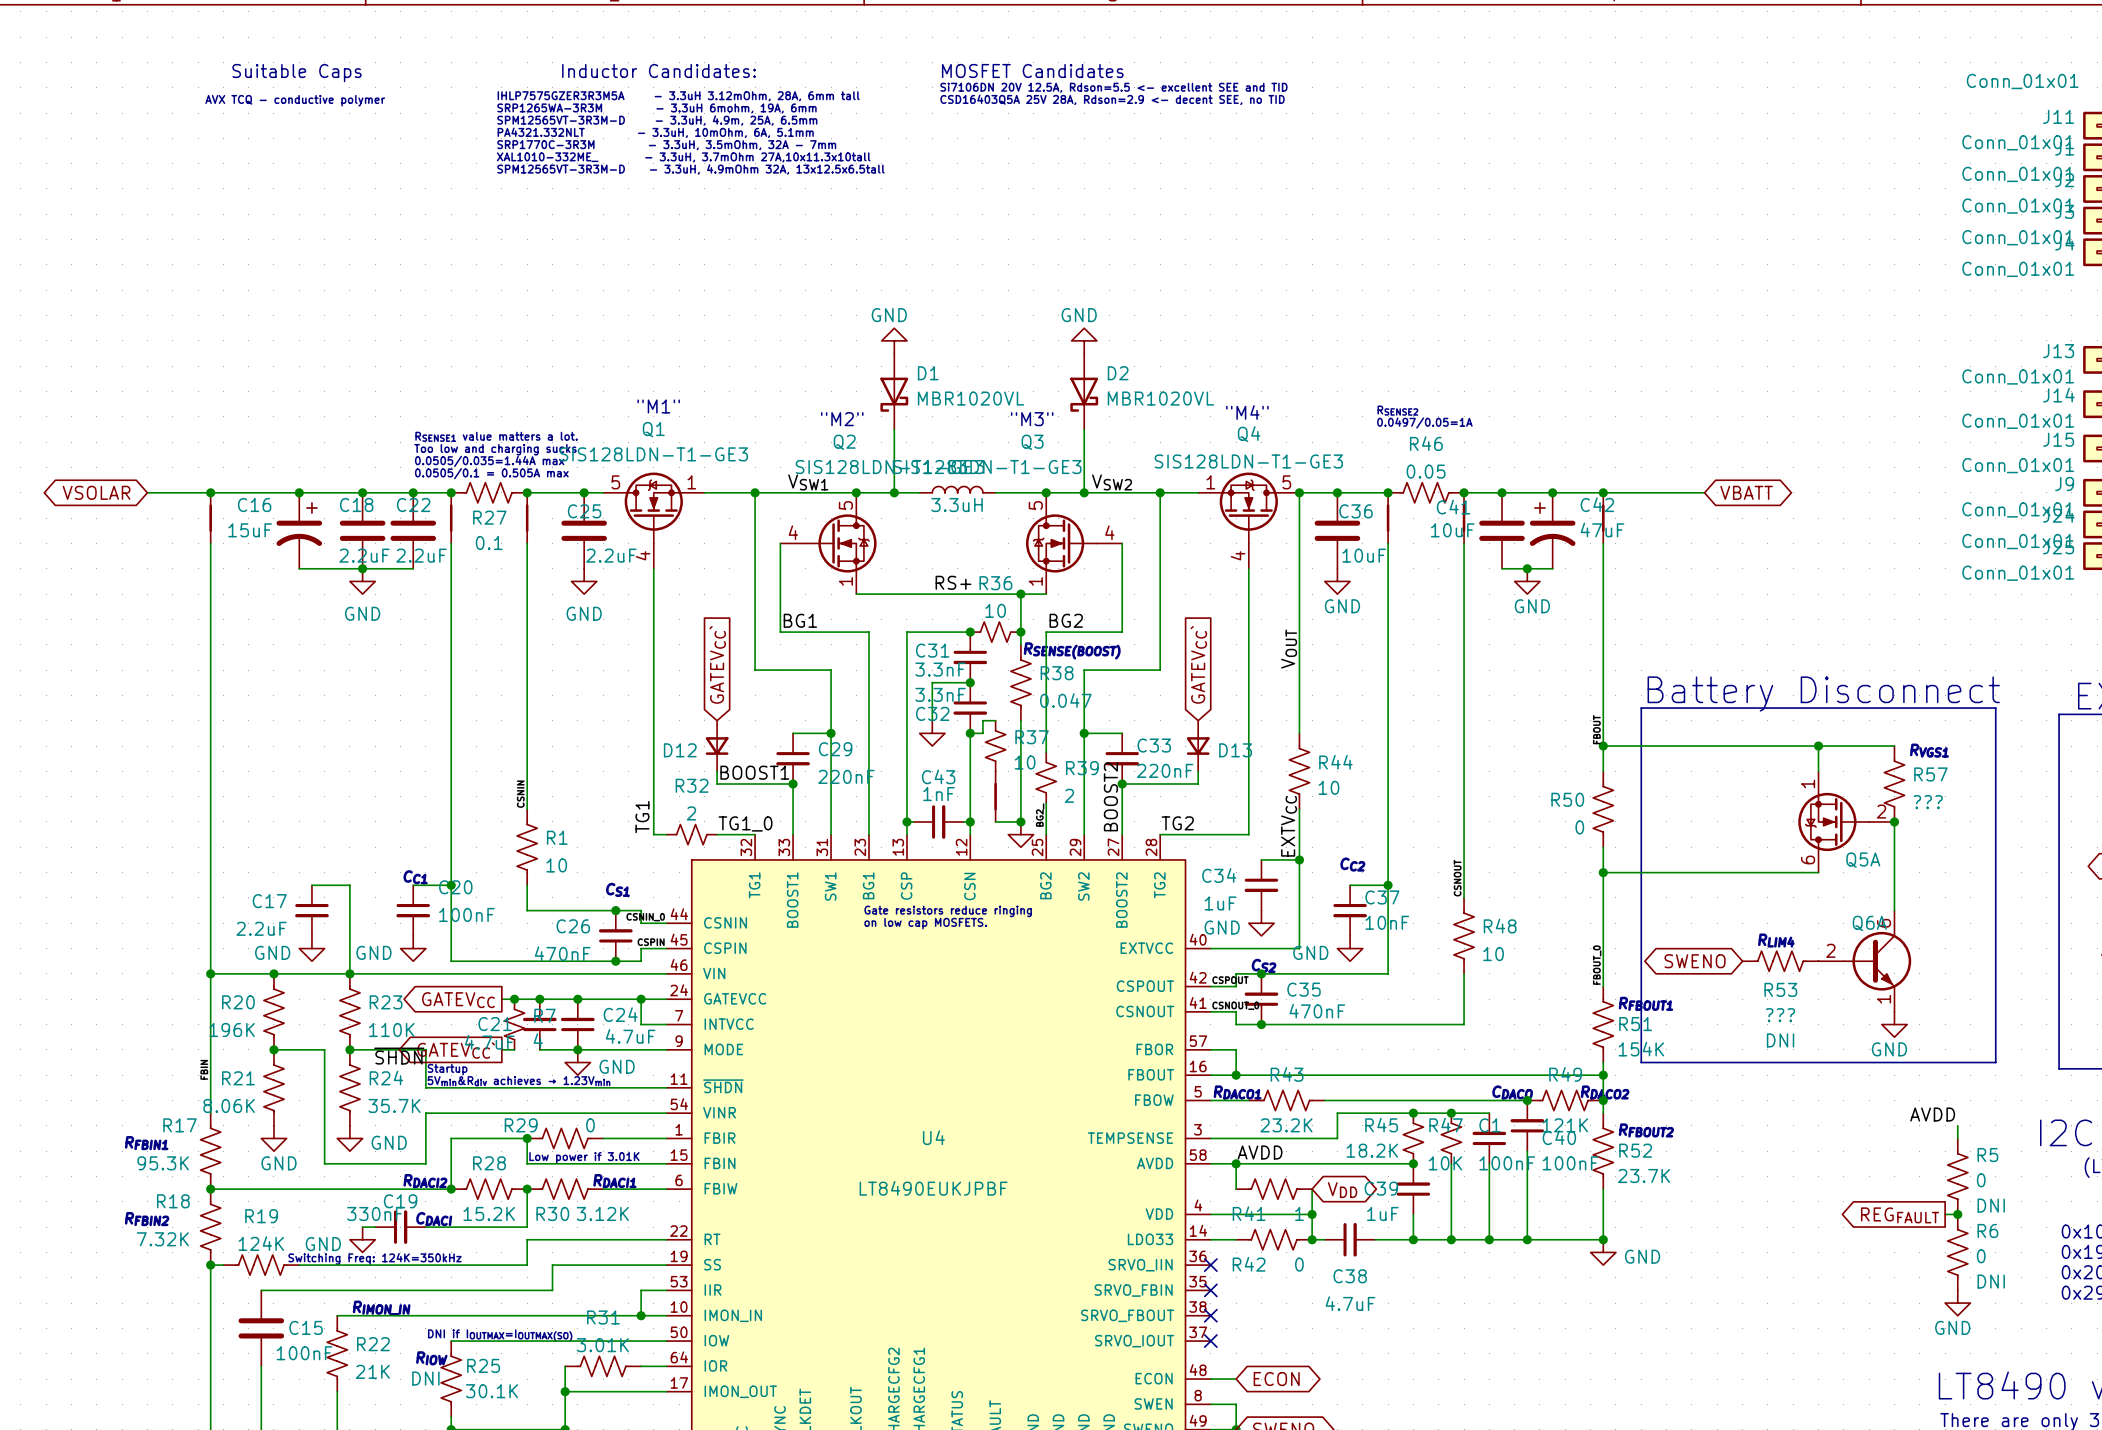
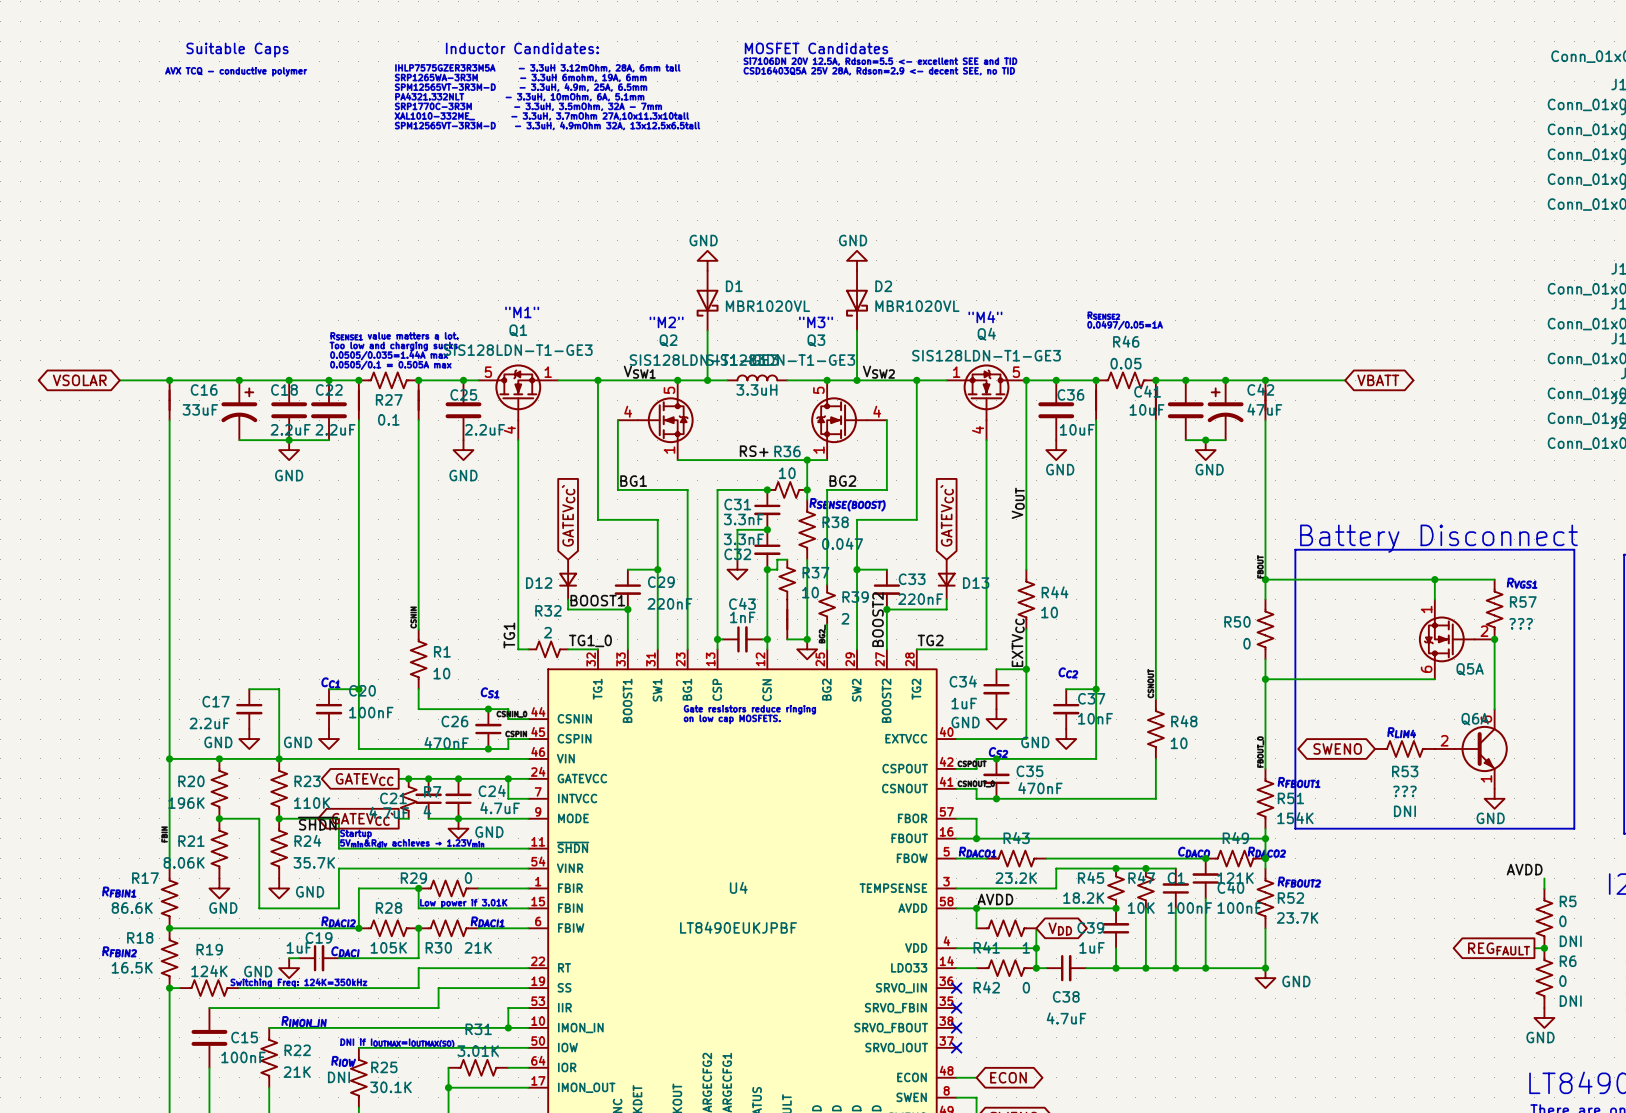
C16 value: 15uF (250, 530) -> 33uF (200, 409)
R17 value: 95.3K (163, 1163) -> 86.6K (132, 908)
C19 value: 330nF (375, 1213) -> 1uF (299, 947)
R28 value: 15.2K (489, 1213) -> 105K (388, 947)
R30 value: 3.12K (602, 1213) -> 21K (478, 947)
R18 value: 7.32K (162, 1239) -> 16.5K (132, 967)

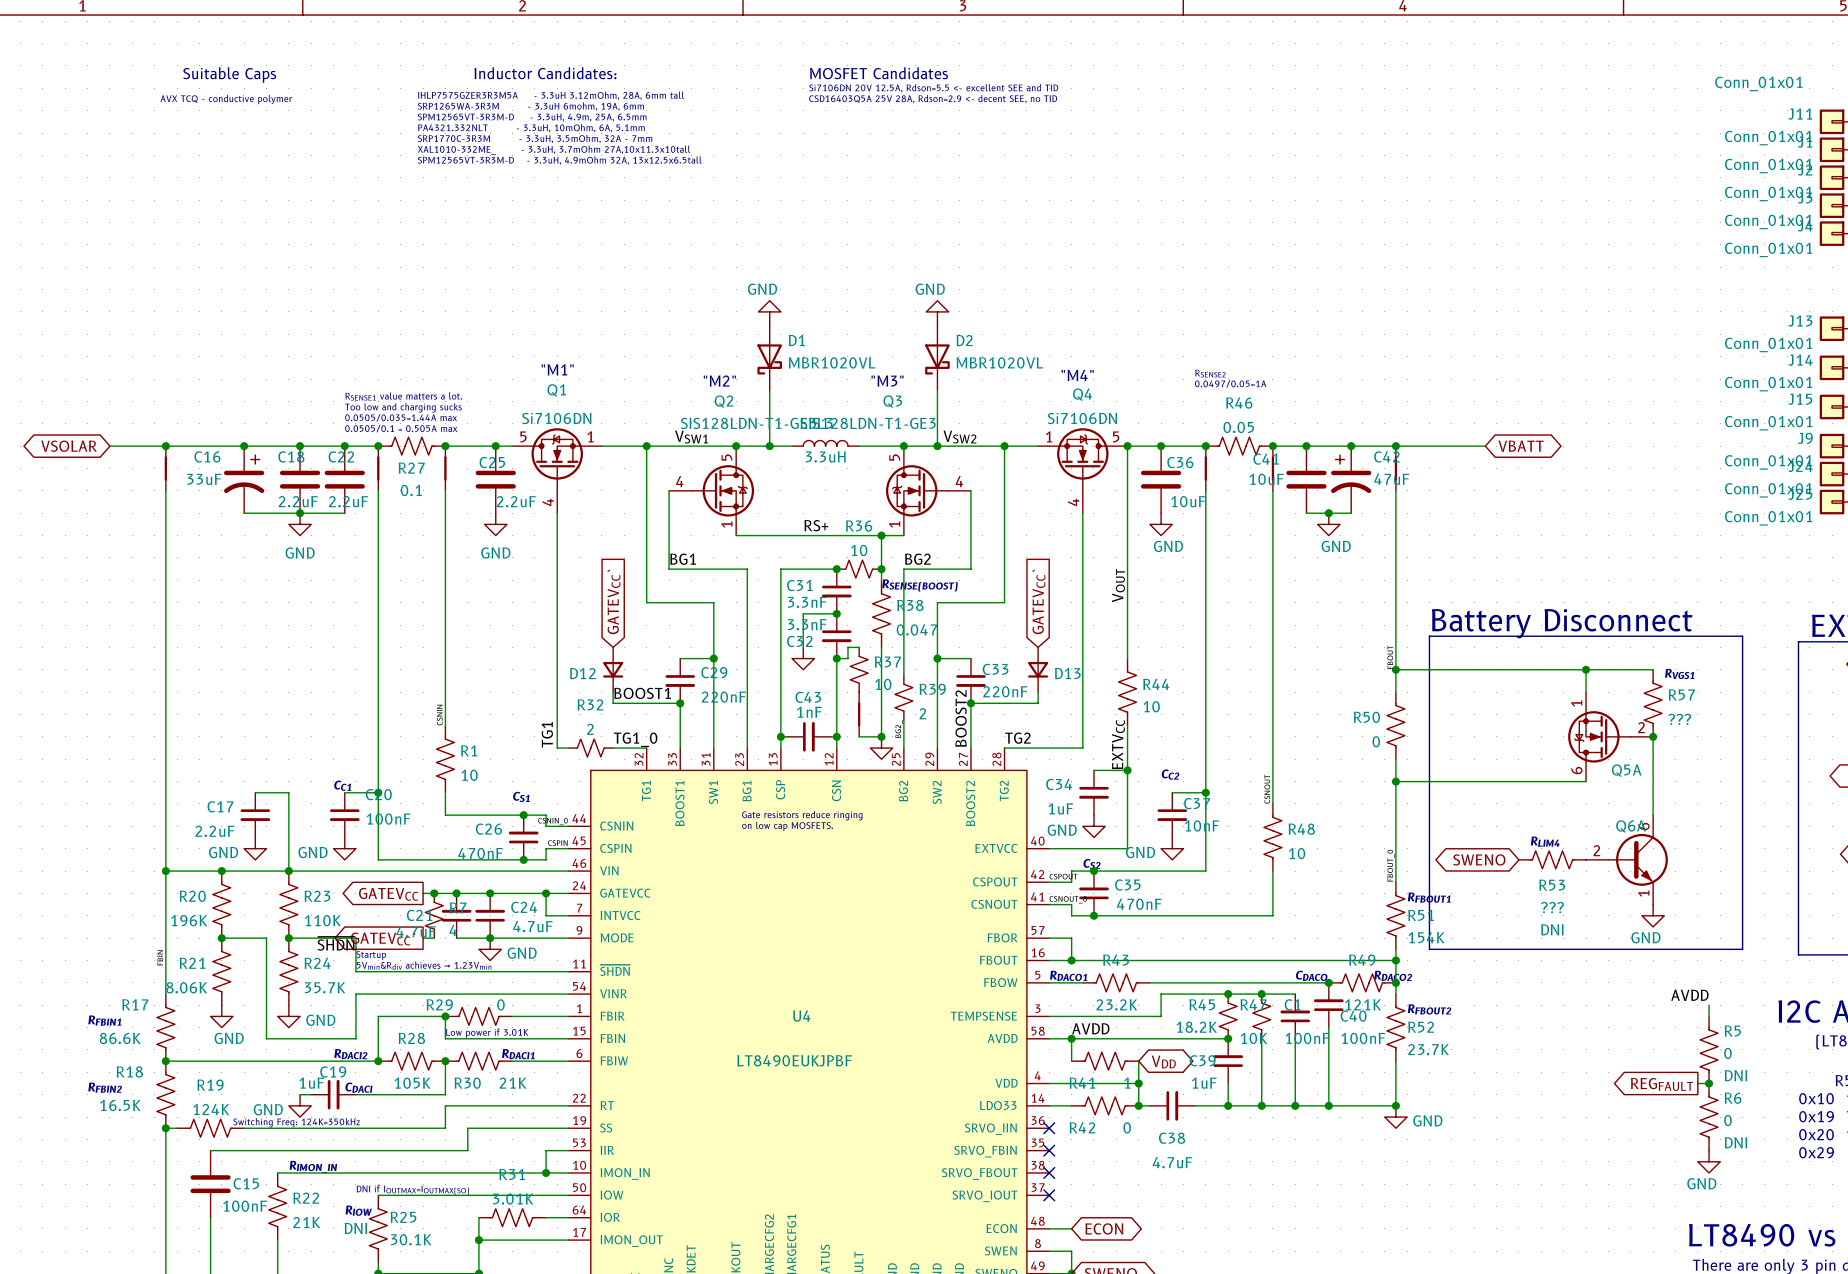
Q1 value: SIS128LDN-T1-GE3 (518, 350) -> Si7106DN (556, 418)
Q4 value: SIS128LDN-T1-GE3 (986, 355) -> Si7106DN (1082, 418)

